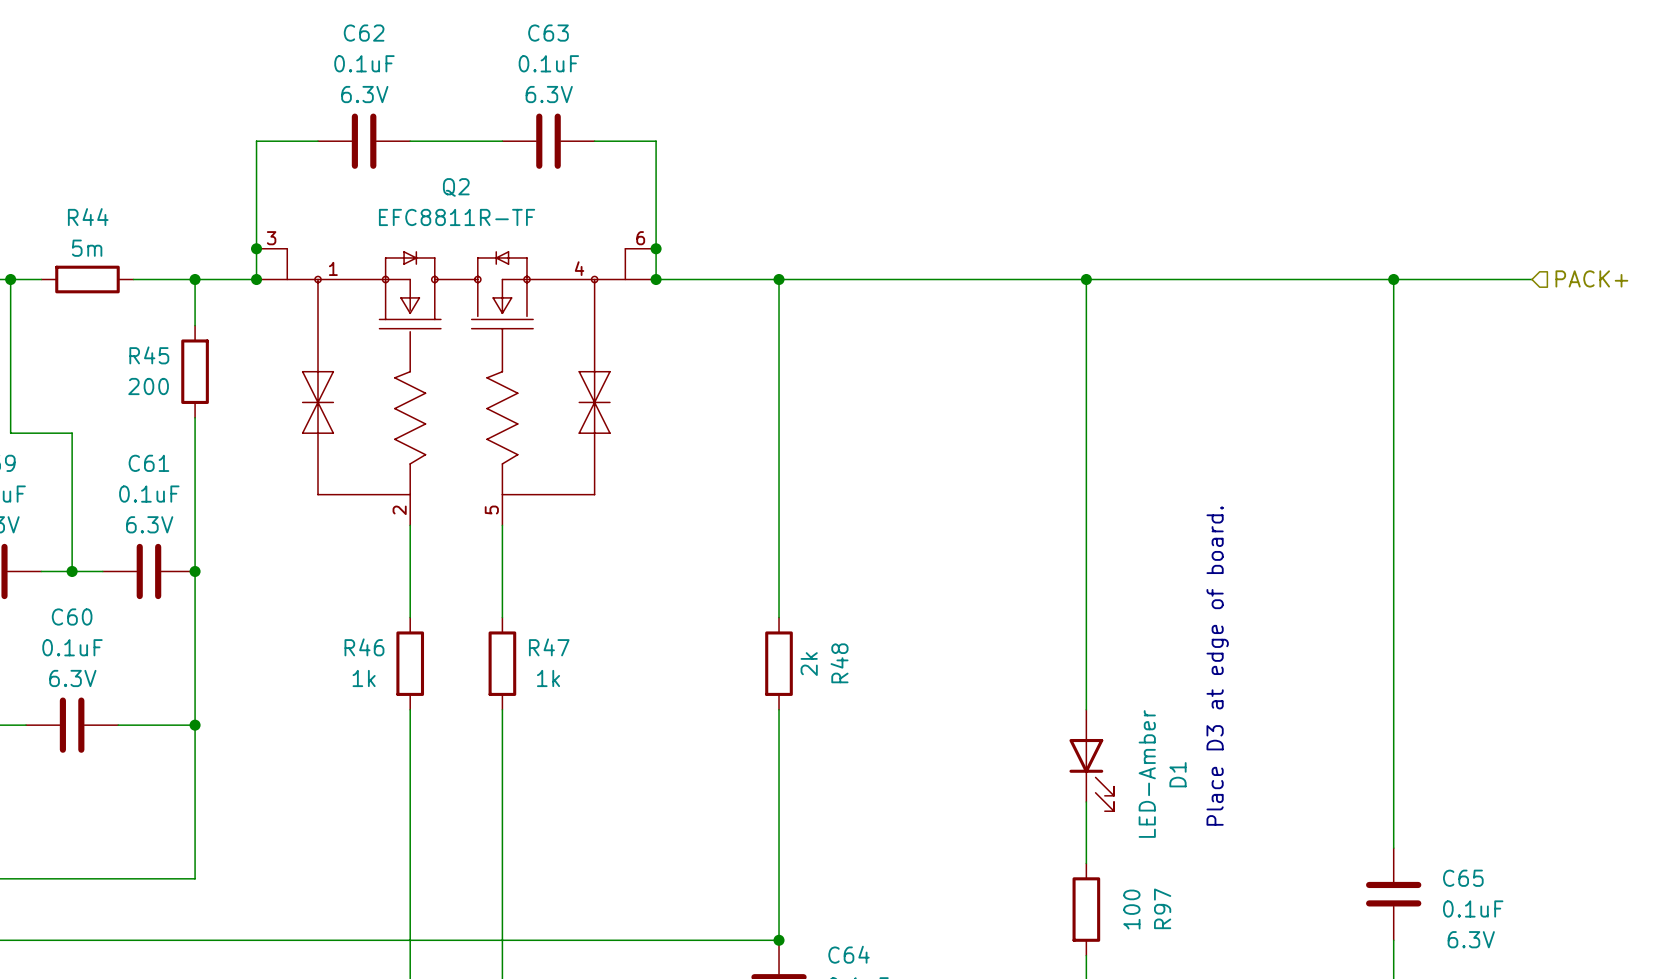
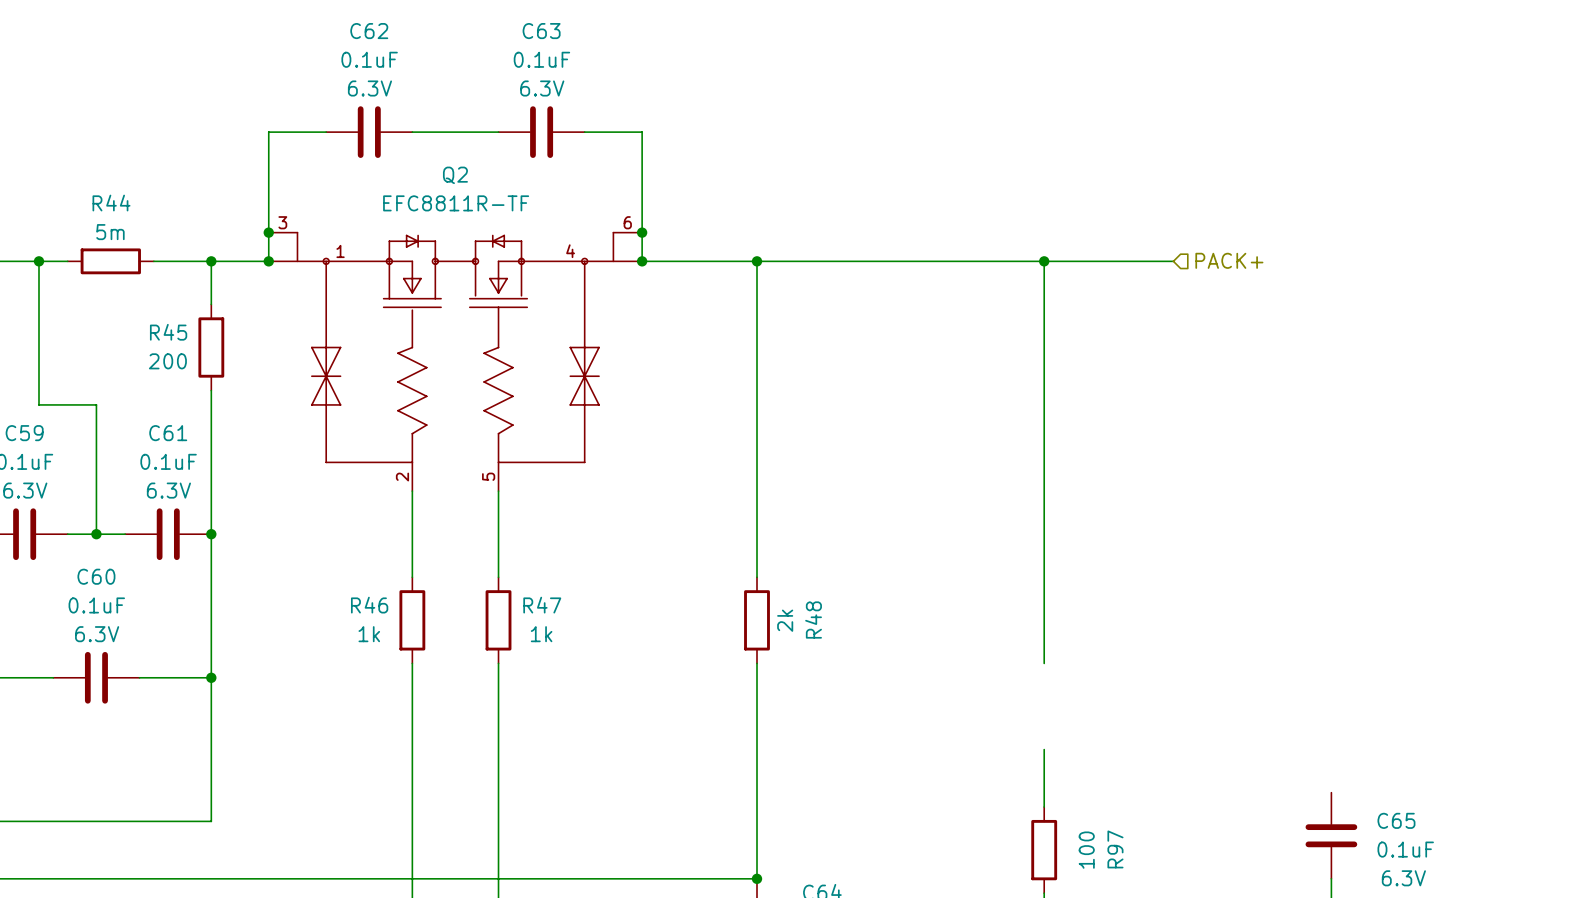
hierarchical label: none -> PACK+ (1229, 260)
hierarchical label: PACK+ (1591, 278) -> none
wire: (1224, 279) (1532, 279) -> none
wire: (1393, 279) (1393, 848) -> none
junction: (1393, 279) -> none
text: Place D3 at edge of board. (1217, 666) -> none
D1: LED-Amber (1091, 760) -> none

